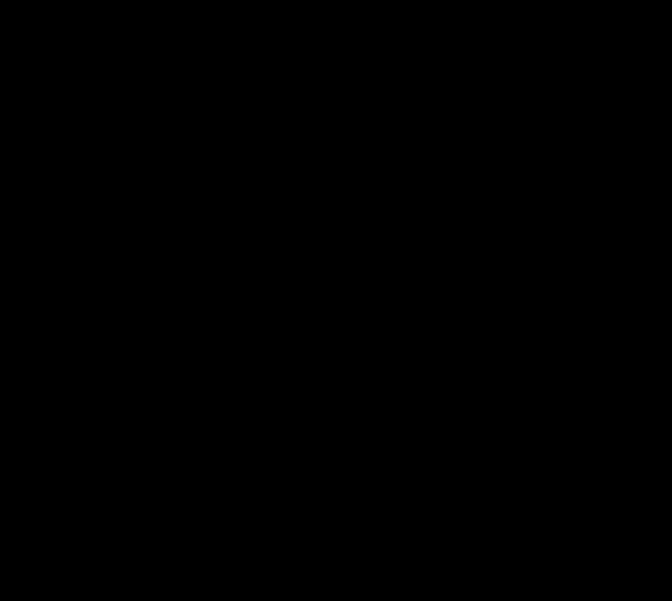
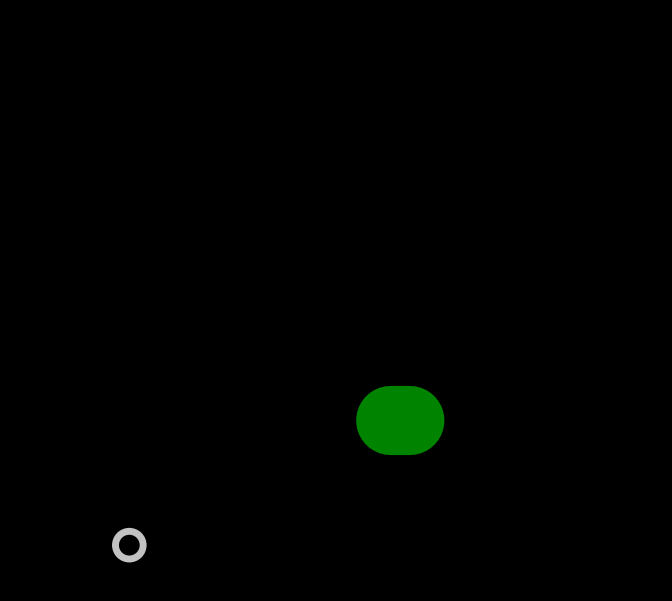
track: none -> (409, 420) (390, 420)
via: none -> (129, 545)

